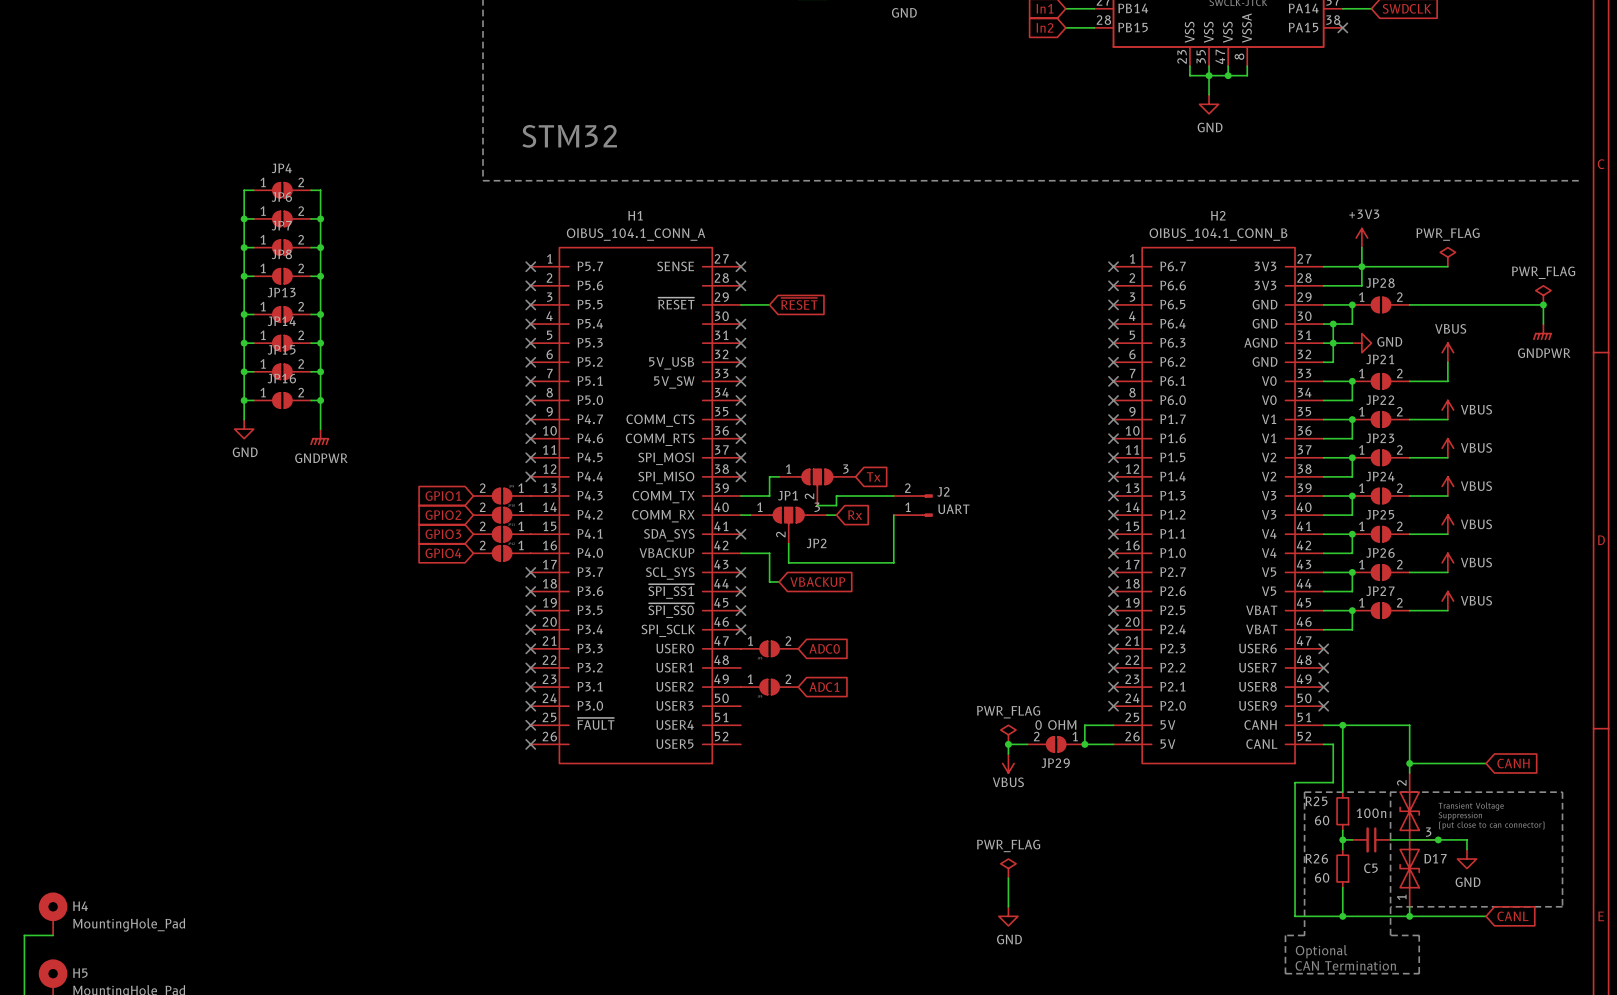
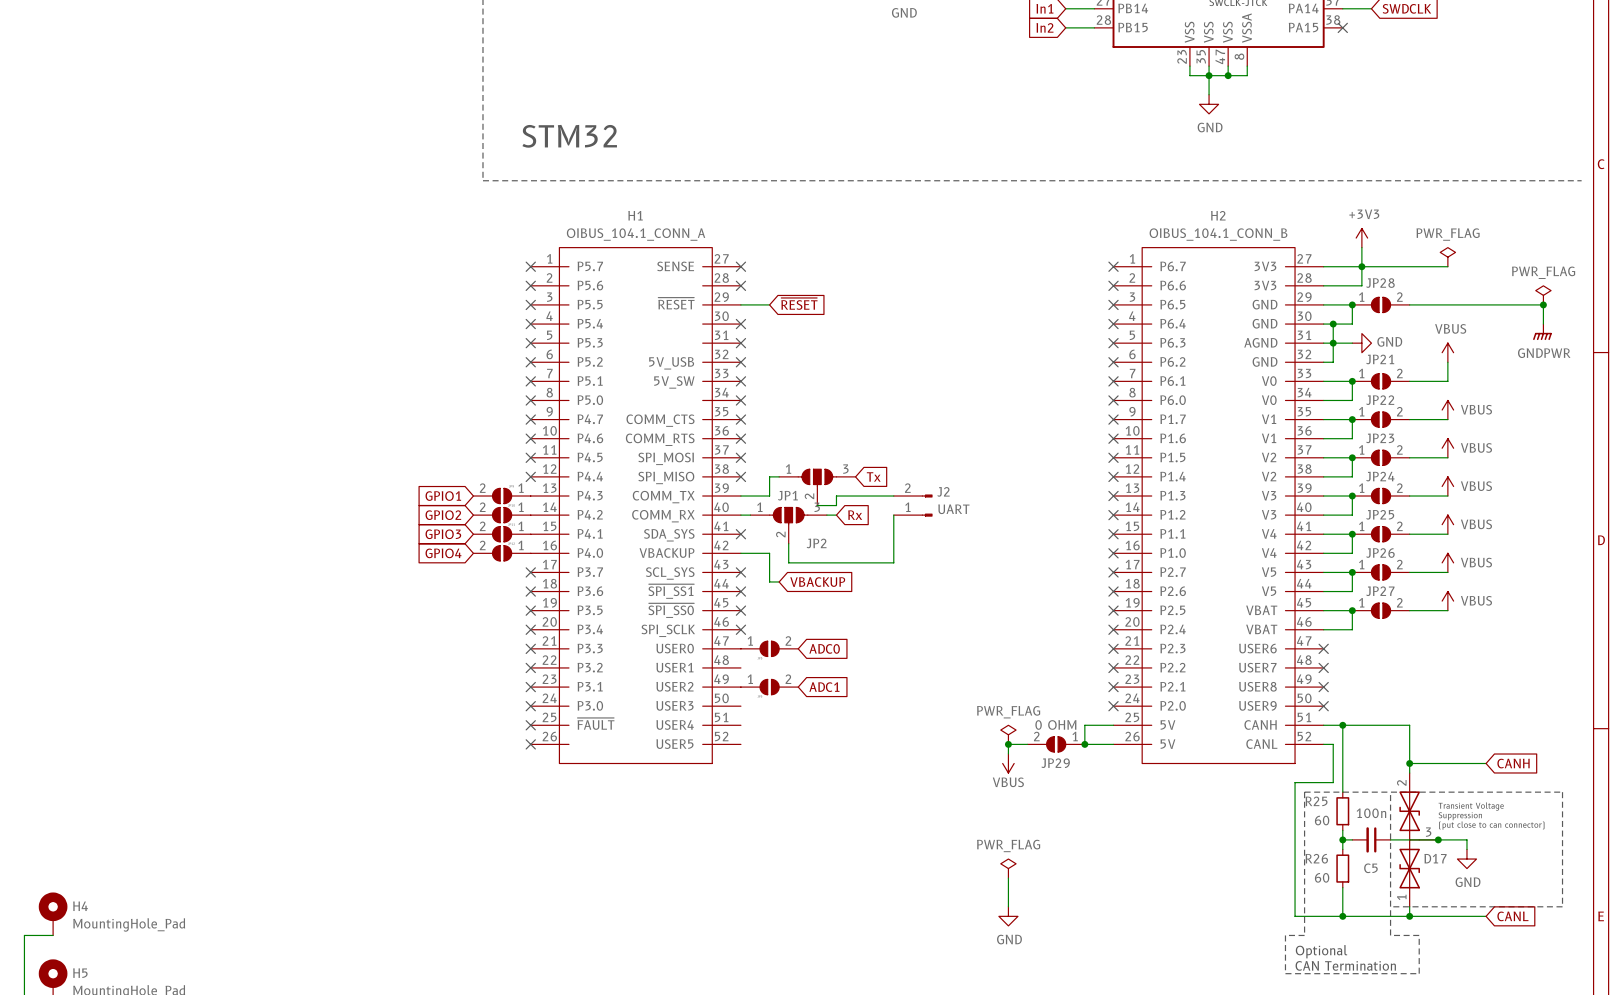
wire: (253, 190) (244, 190) (244, 419) -> none
JP4: (282, 190) -> none
wire: (311, 190) (320, 190) (320, 429) -> none
wire: (244, 218) (253, 218) -> none
junction: (244, 218) -> none
JP6: (282, 218) -> none
wire: (311, 218) (320, 218) -> none
junction: (320, 218) -> none
wire: (244, 247) (253, 247) -> none
junction: (244, 247) -> none
JP7: (282, 247) -> none
wire: (311, 247) (320, 247) -> none
junction: (320, 247) -> none
wire: (244, 276) (253, 276) -> none
junction: (244, 276) -> none
JP8: (282, 276) -> none
wire: (311, 276) (320, 276) -> none
junction: (320, 276) -> none
wire: (244, 314) (253, 314) -> none
junction: (244, 314) -> none
JP13: (282, 314) -> none
wire: (311, 314) (320, 314) -> none
junction: (320, 314) -> none
wire: (244, 343) (253, 343) -> none
junction: (244, 343) -> none
JP14: (282, 343) -> none
wire: (311, 343) (320, 343) -> none
junction: (320, 343) -> none
wire: (244, 371) (253, 371) -> none
junction: (244, 371) -> none
JP15: (282, 371) -> none
wire: (311, 371) (320, 371) -> none
junction: (320, 371) -> none
wire: (244, 400) (253, 400) -> none
junction: (244, 400) -> none
JP16: (282, 400) -> none
wire: (311, 400) (320, 400) -> none
junction: (320, 400) -> none
power symbol: GND (244, 429) -> none
power symbol: GNDPWR (319, 437) -> none

